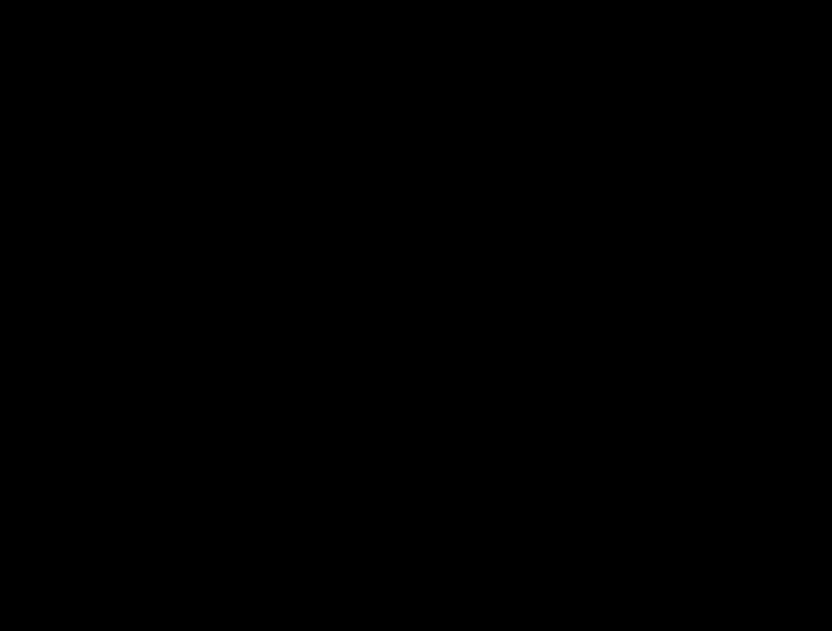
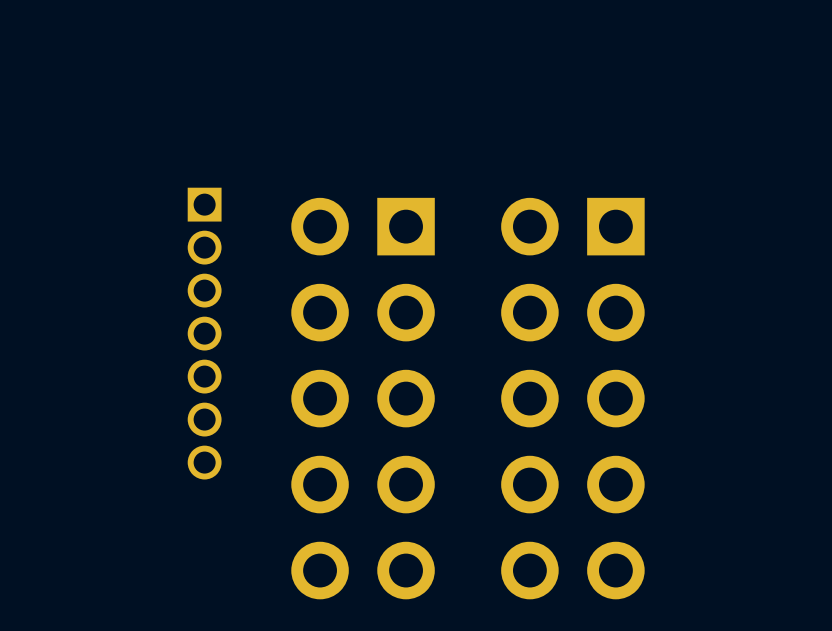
part: none -> (204, 333)
part: none -> (363, 398)
part: none -> (572, 398)

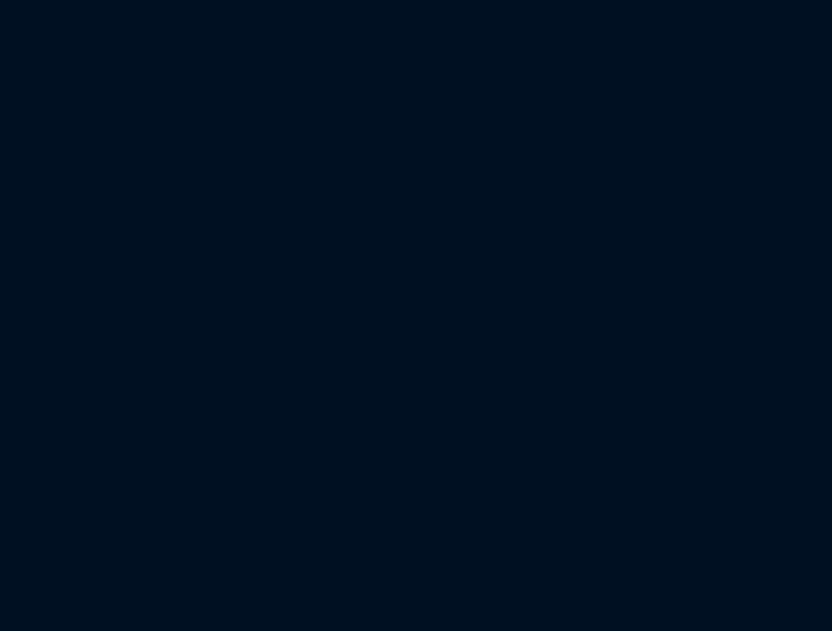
part: (204, 333) -> none
part: (363, 398) -> none
part: (572, 398) -> none

